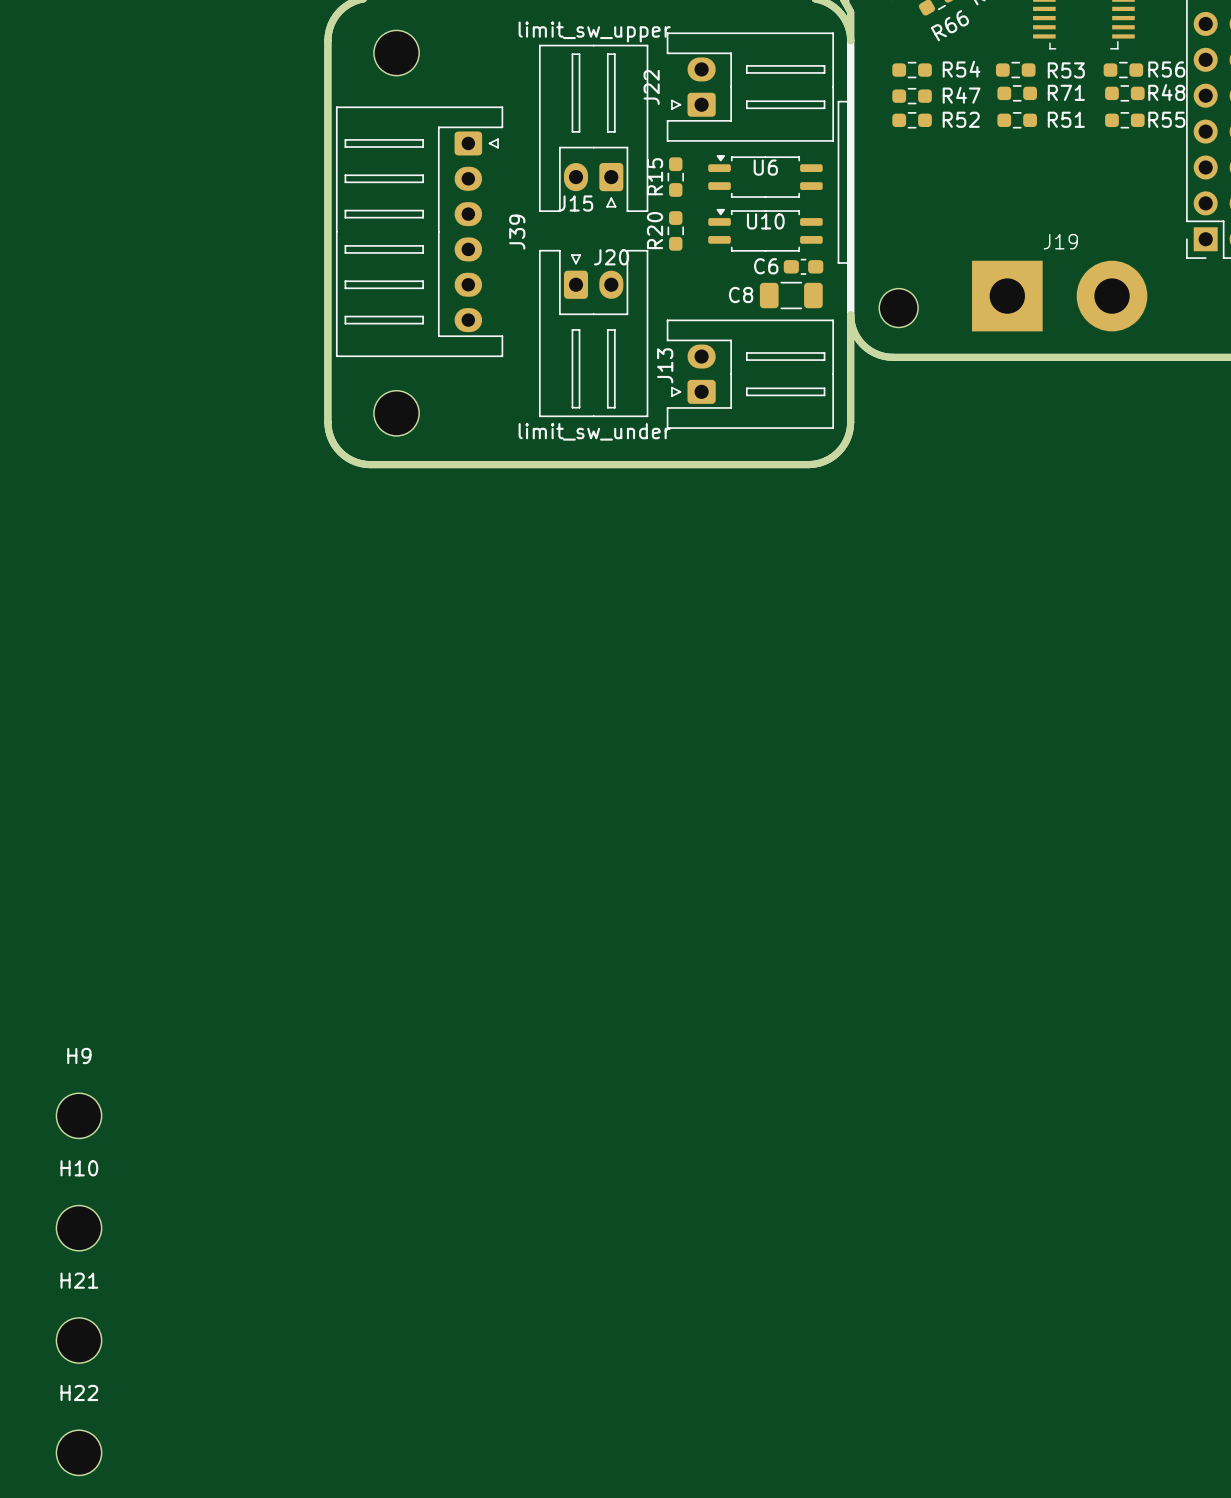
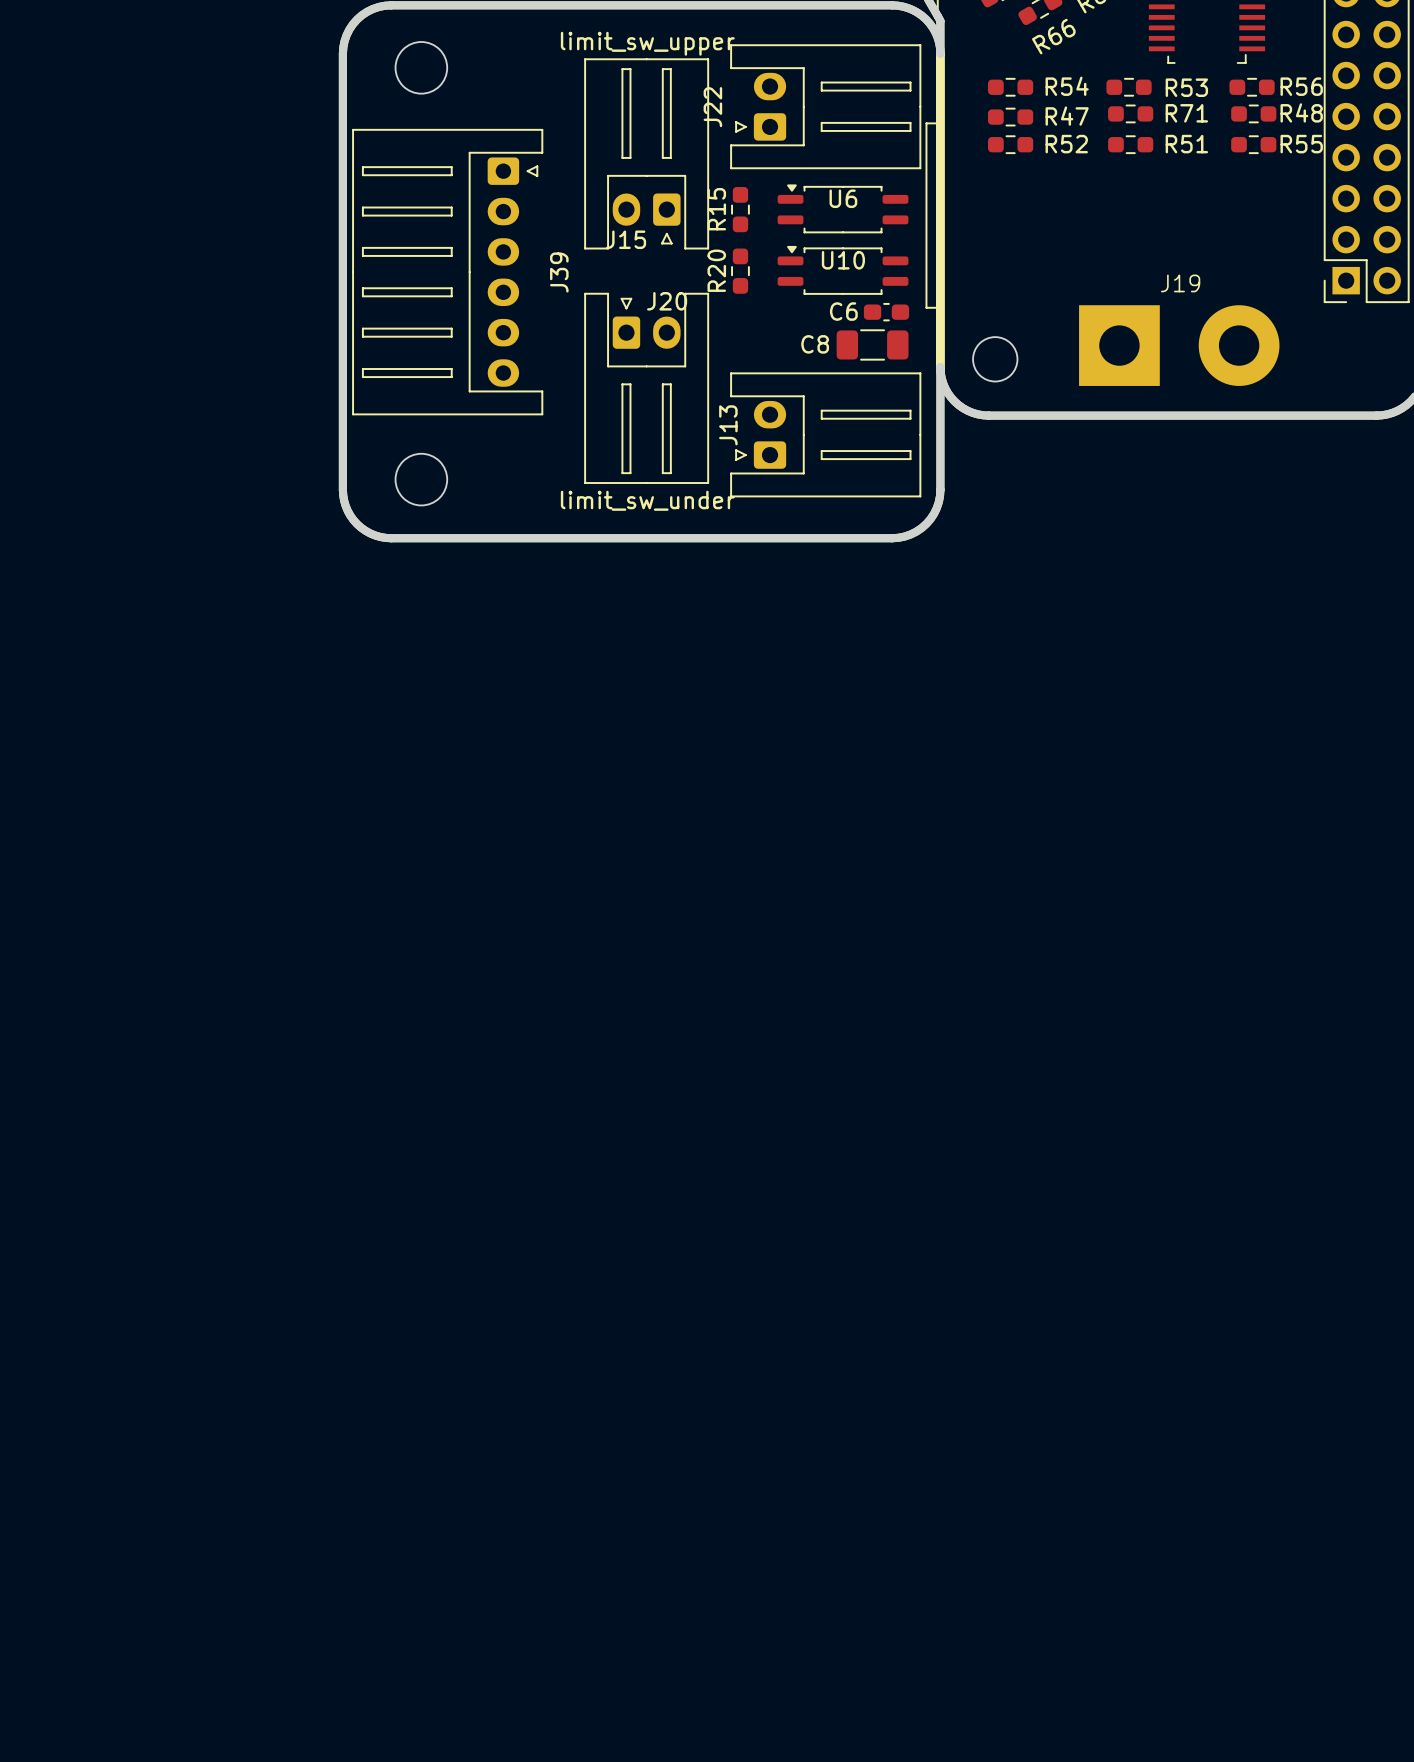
H9: (79, 1115) -> none
H10: (79, 1228) -> none
H21: (79, 1340) -> none
H22: (79, 1452) -> none

